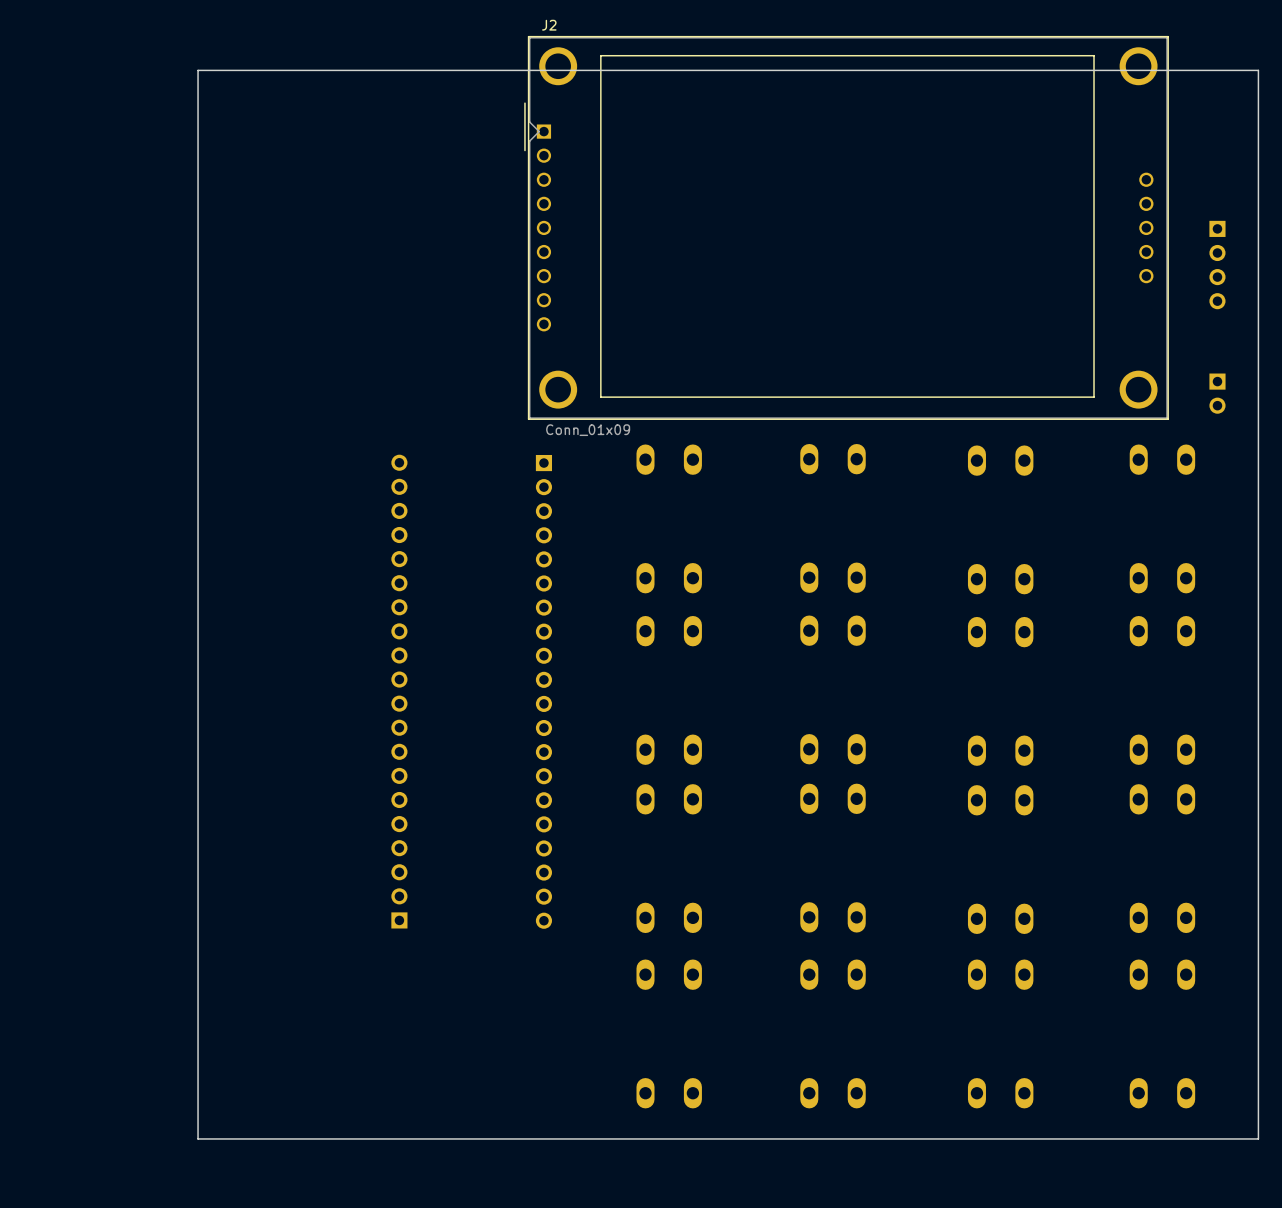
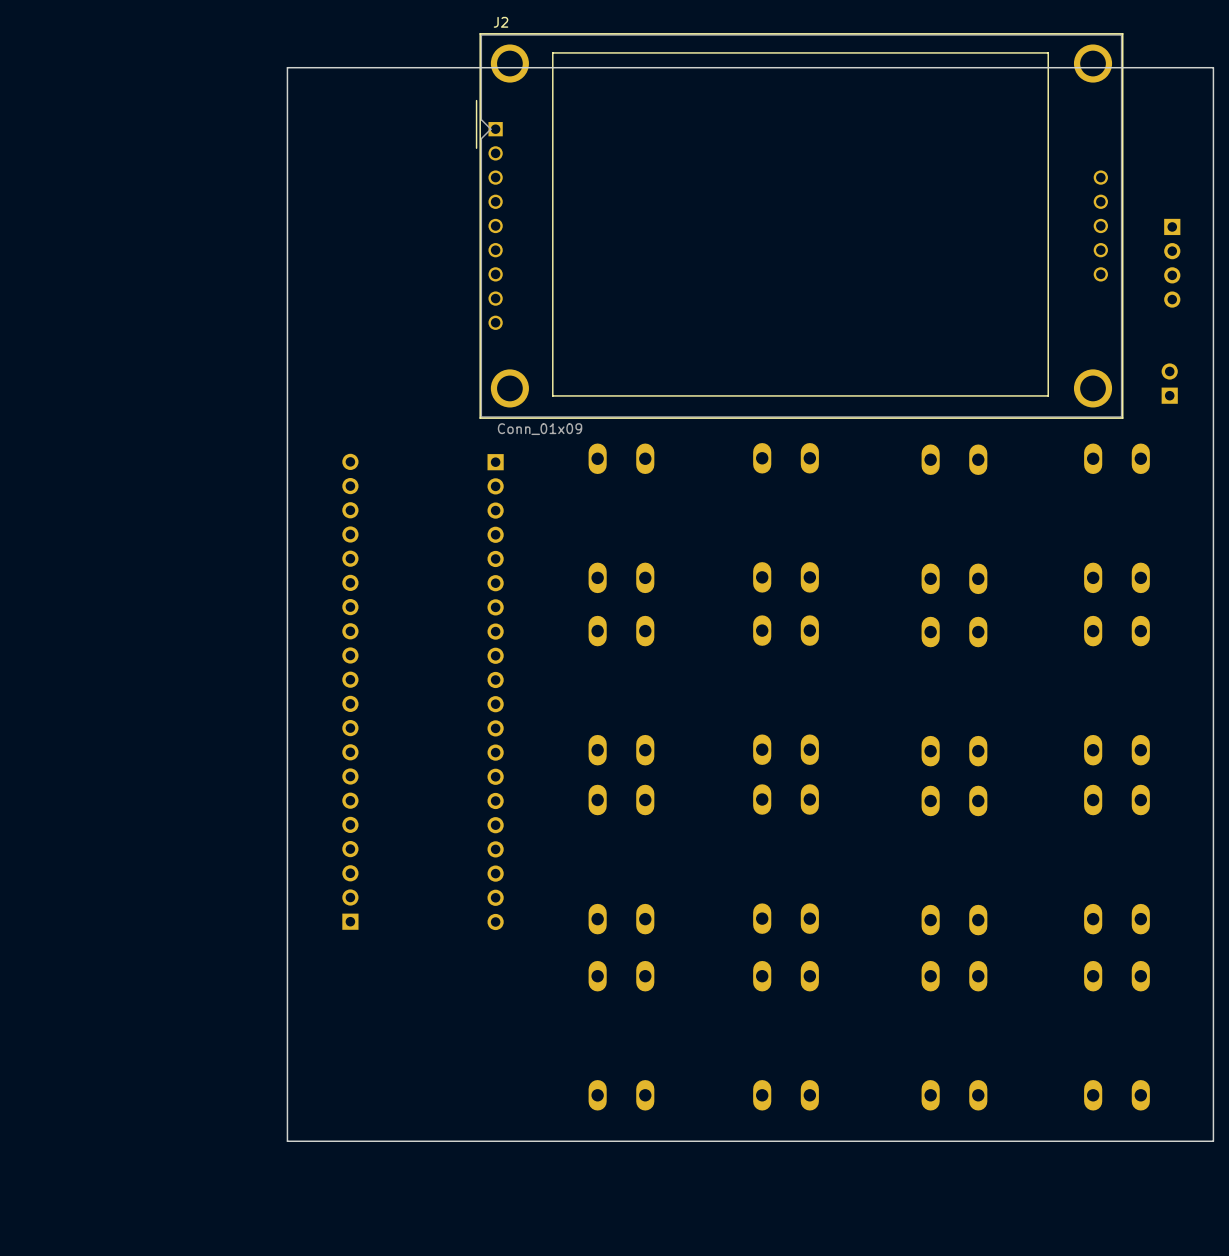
board edge: (336, 70) (198, 70) (198, 1138) (336, 1138) -> (287, 67) (287, 1141)
part rotation: 0° (1217, 393) -> 180° (1169, 383)

